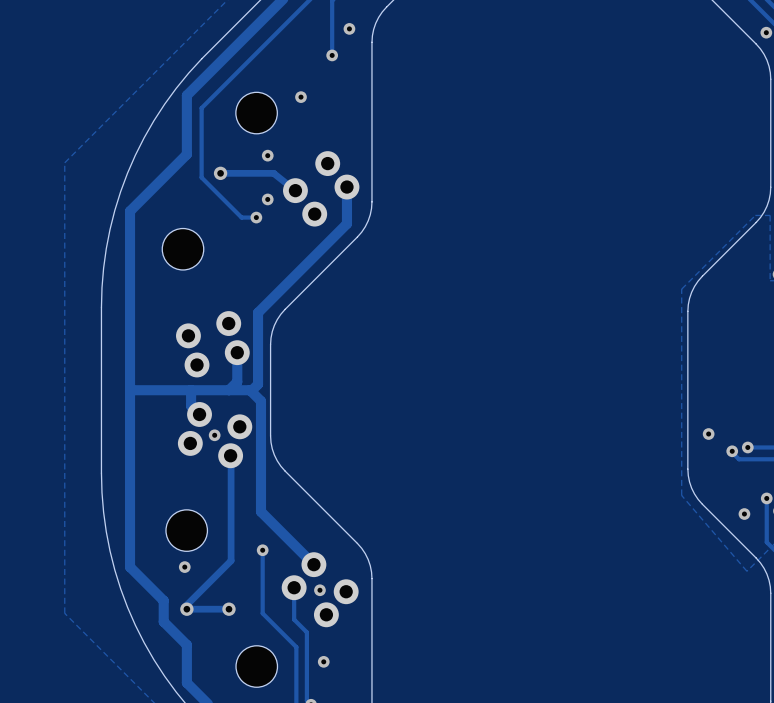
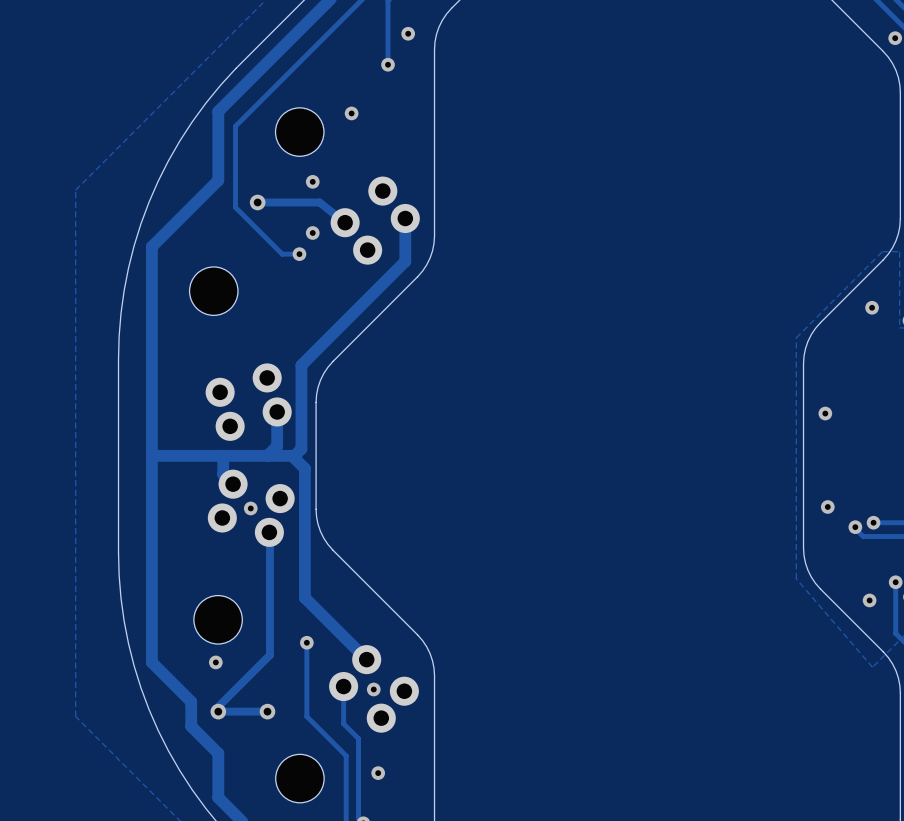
via: none -> (872, 307)
via: none -> (825, 413)

